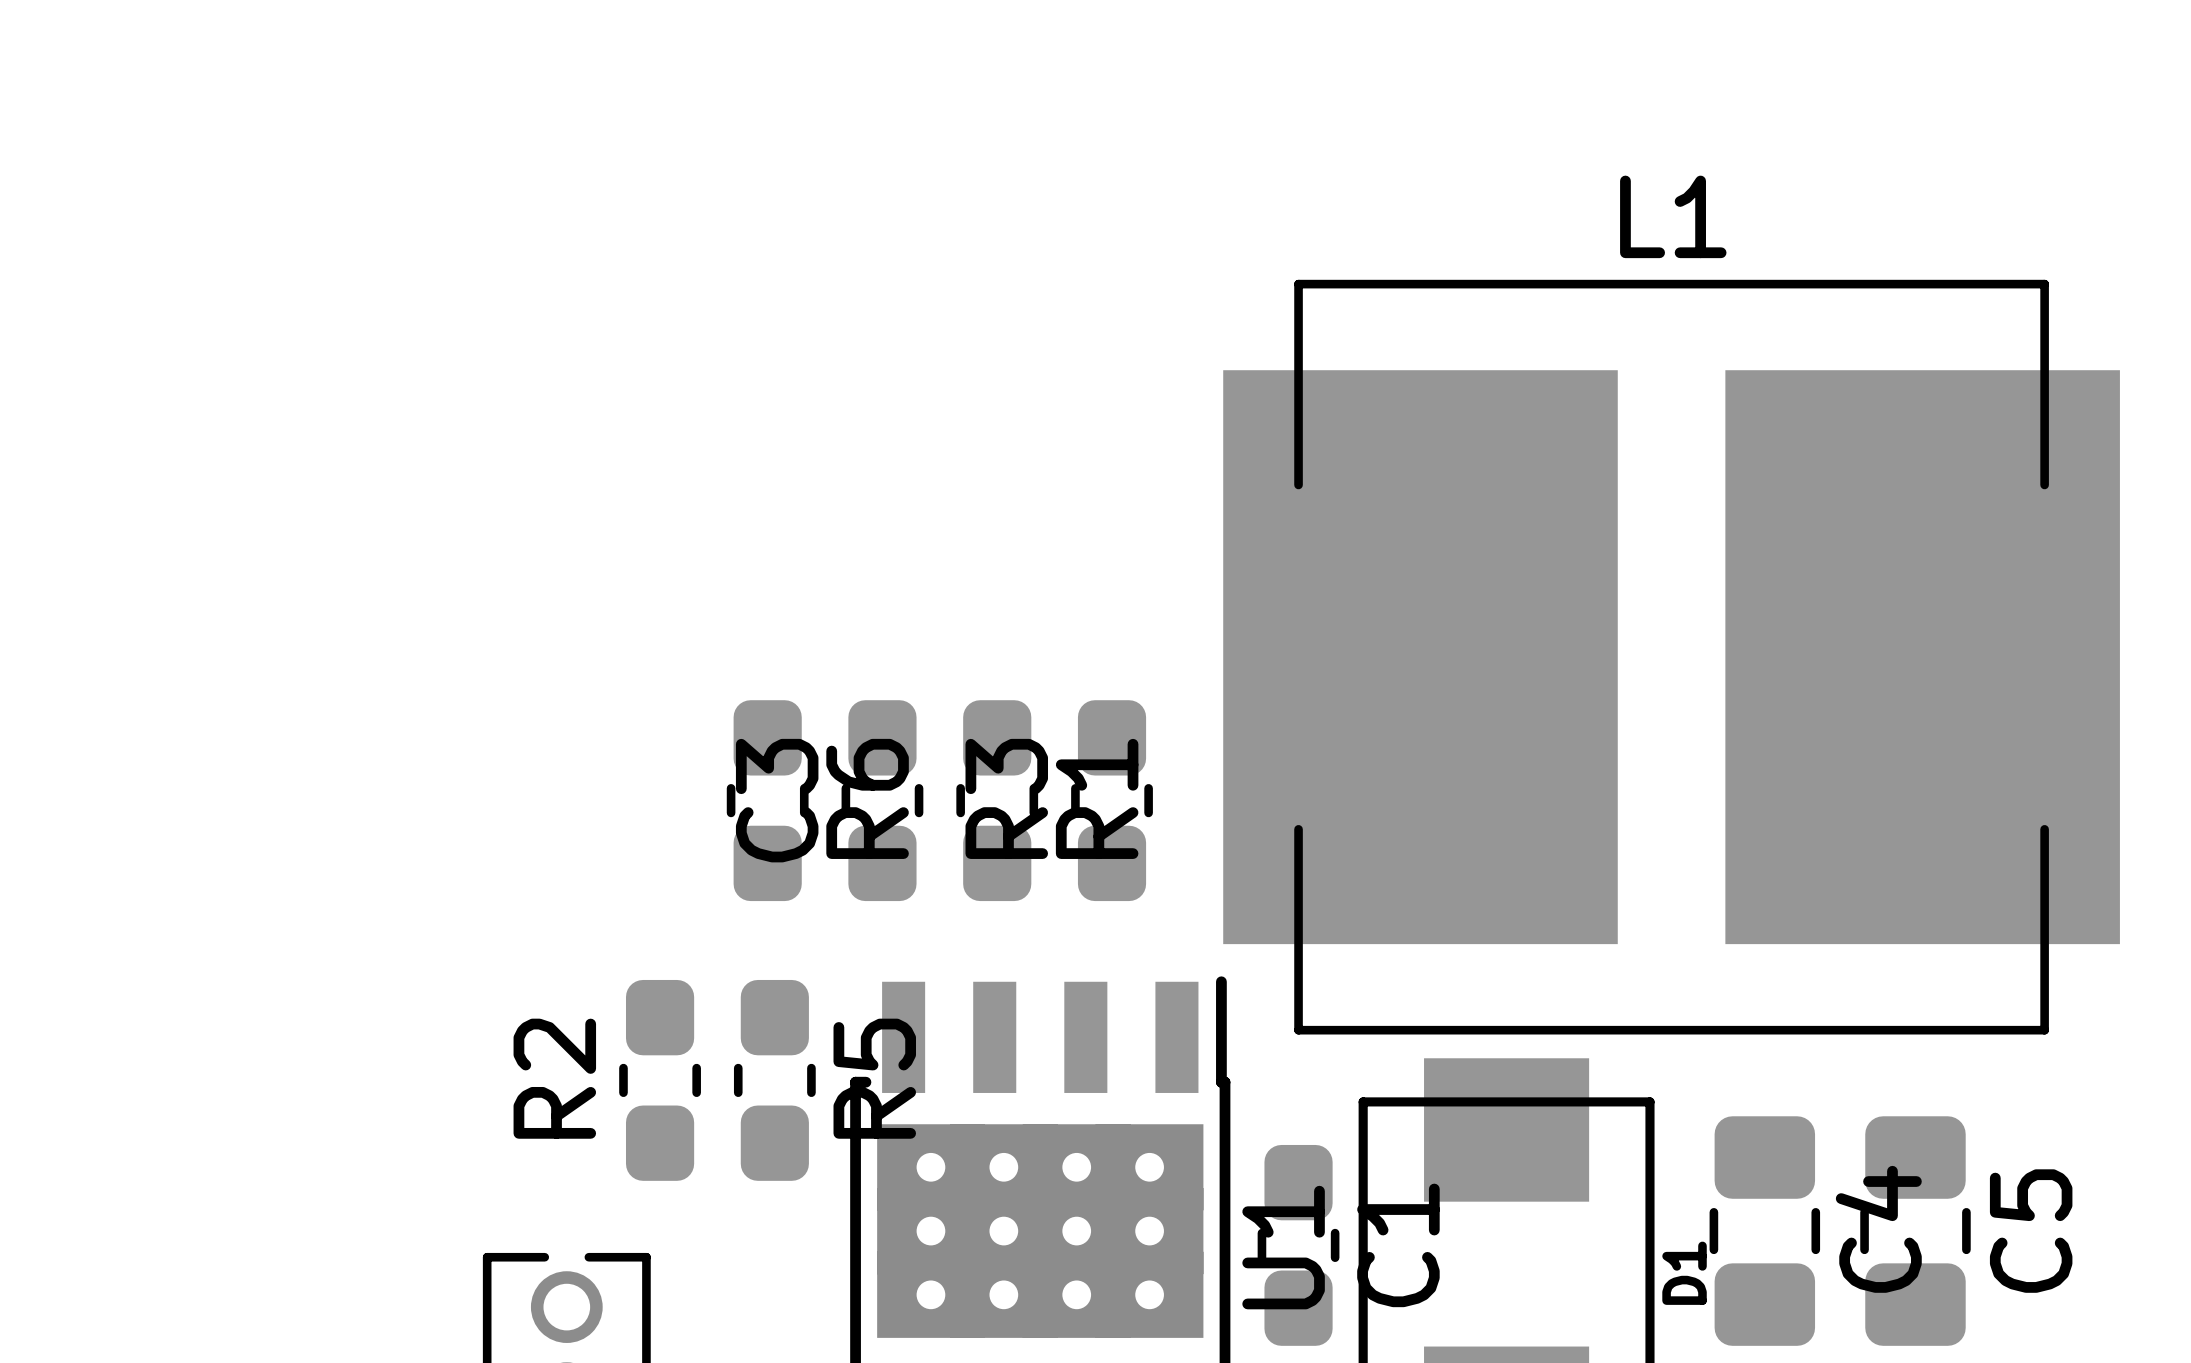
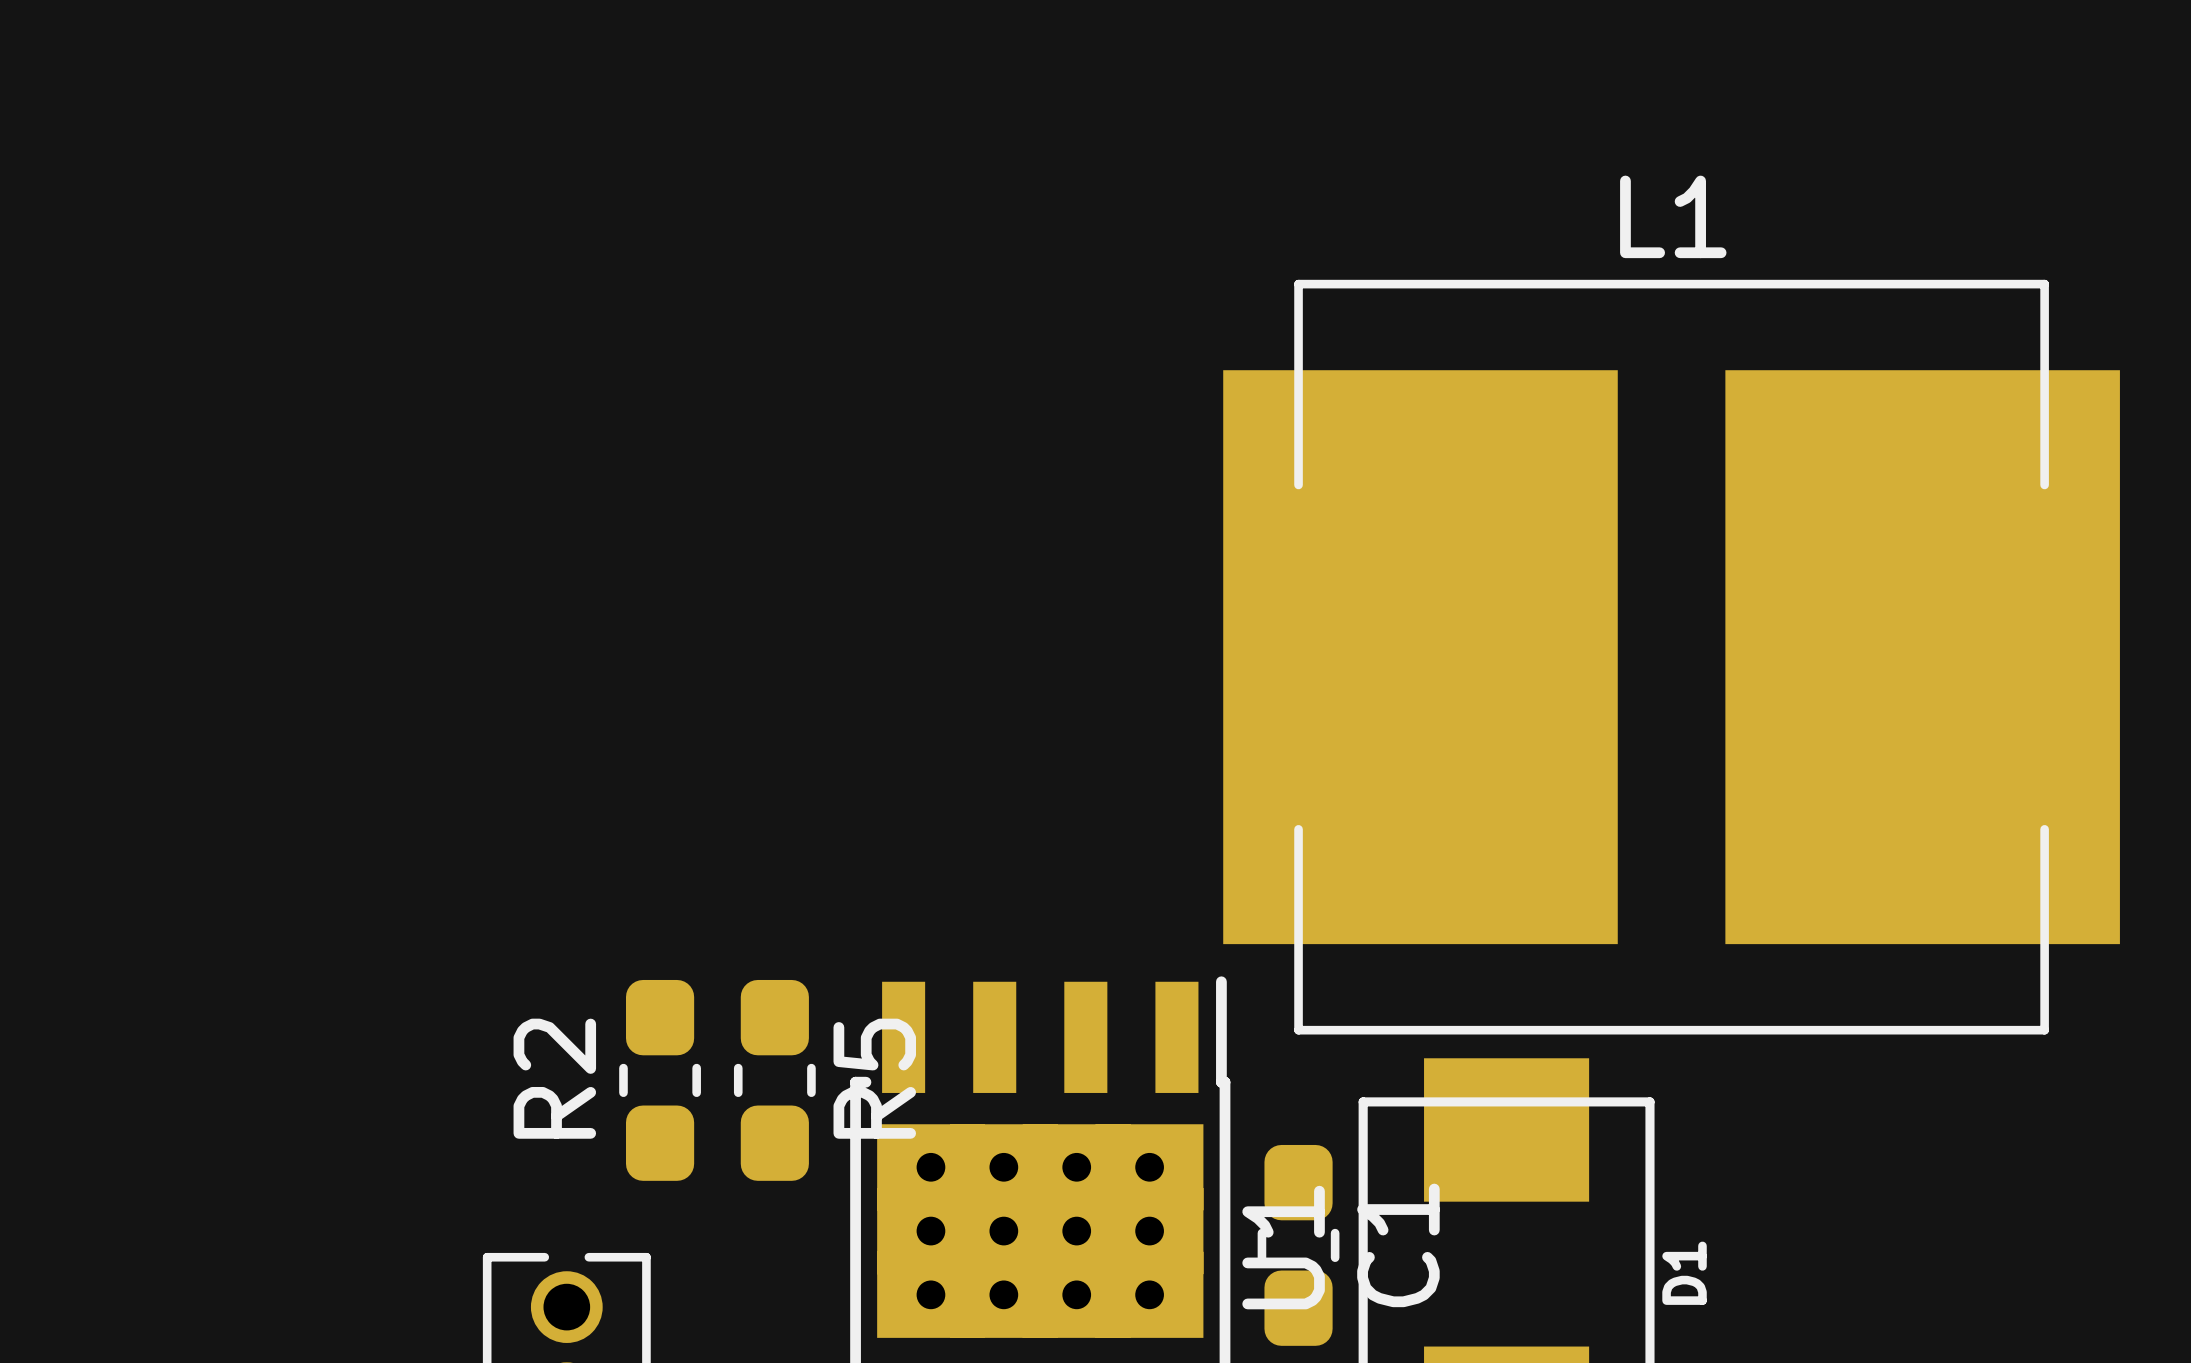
R6: (767, 800) -> none
C3: (882, 800) -> none
R1: (997, 800) -> none
R3: (1112, 800) -> none
C4: (1764, 1231) -> none
C5: (1915, 1231) -> none

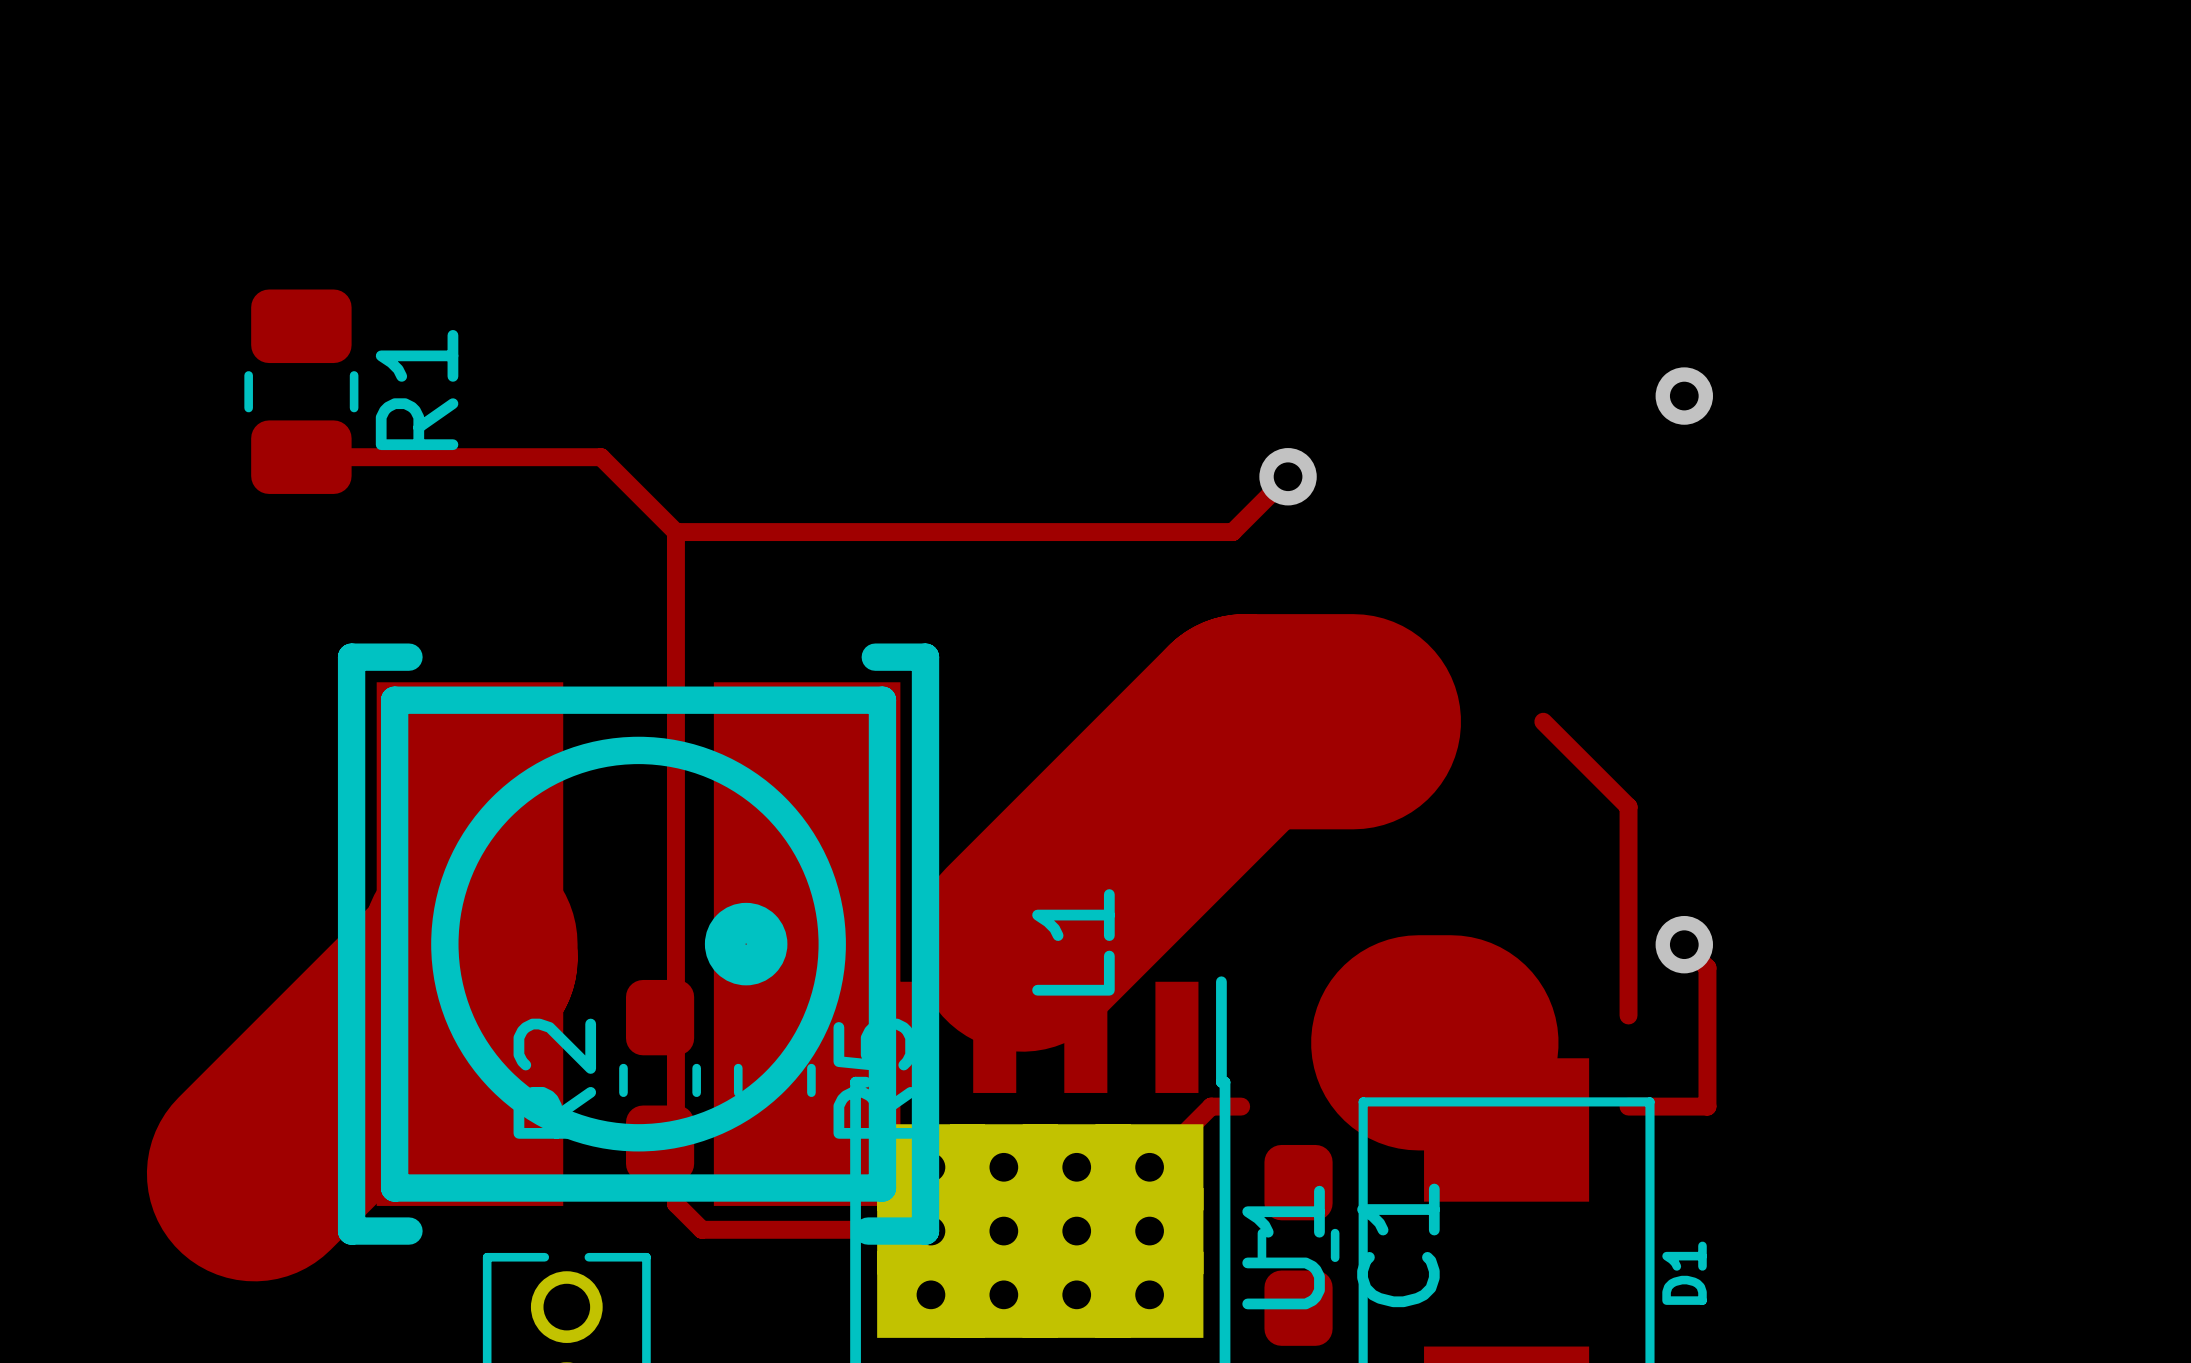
L1 name position: L1 (1673, 216) -> L1 (1073, 942)
L1 footprint: [1223, 279, 2120, 1035] -> [337, 643, 940, 1245]
R1: none -> (301, 391)
via: none -> (1684, 396)
track: none -> (301, 457) (601, 457) (675, 532)
track: none -> (1288, 476) (1232, 532) (675, 532)
via: none -> (1288, 476)
track: none -> (675, 532) (675, 1203) (701, 1229) (1087, 1229) (1211, 1106) (1241, 1106)
track: none -> (1412, 721) (1244, 721) (1022, 944)
track: none -> (1543, 721) (1628, 806) (1628, 1015)
track: none -> (469, 944) (469, 958) (254, 1173)
track: none -> (1684, 944) (1707, 967) (1707, 1106) (1628, 1106)
via: none -> (1684, 944)
track: none -> (1371, 1042) (1498, 1042)

